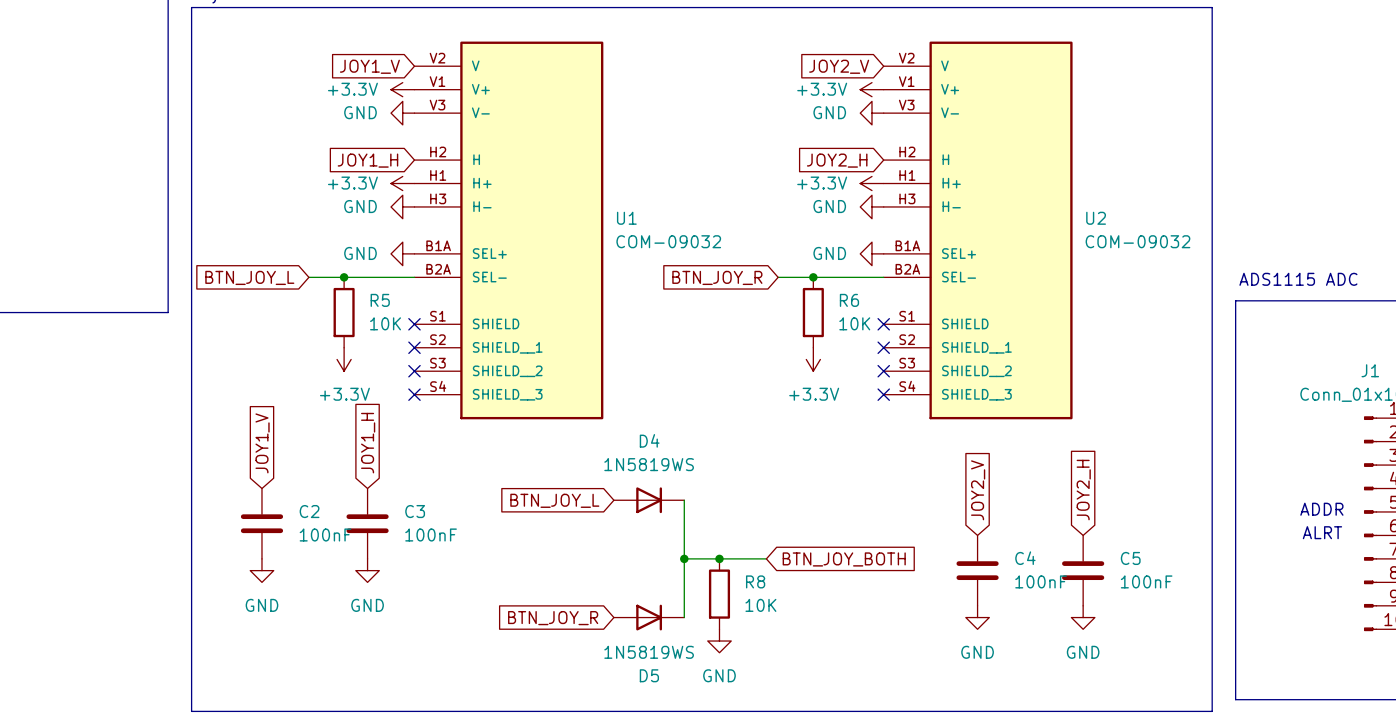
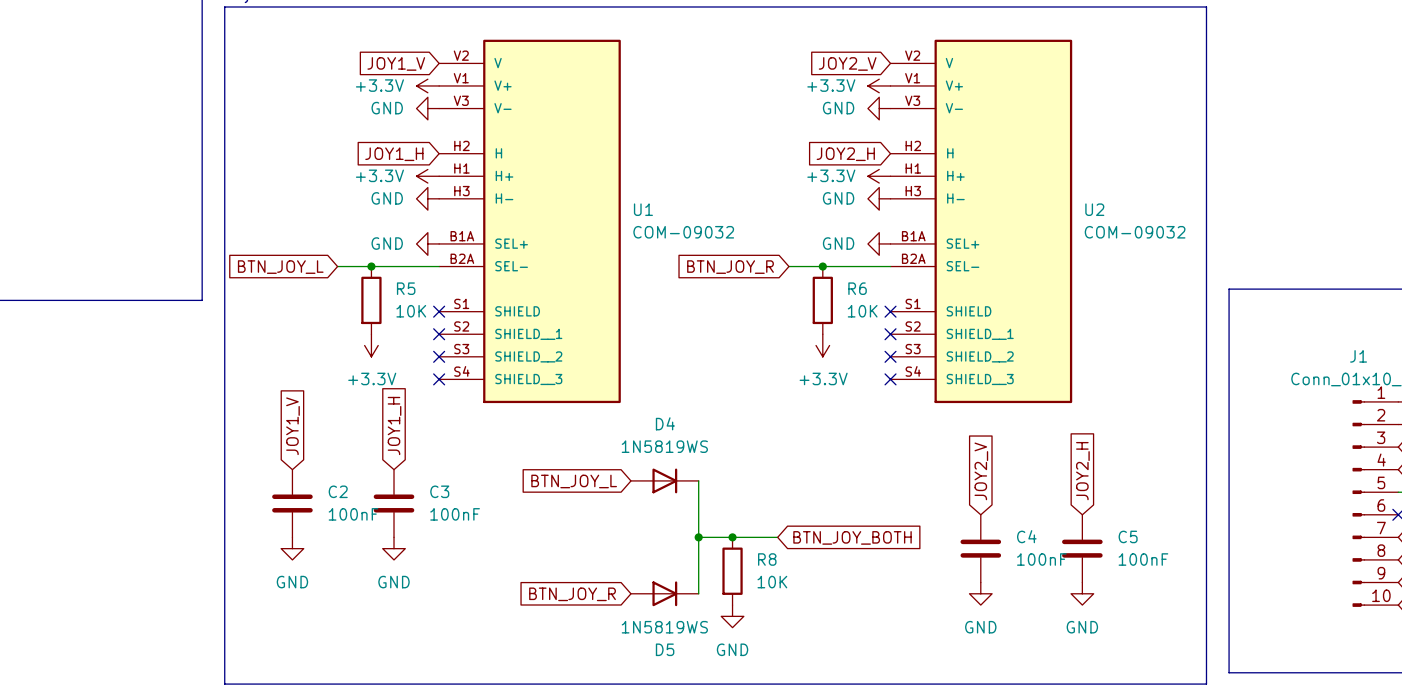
text: ADS1115 ADC (1298, 279) -> none
text: ADDR (1321, 509) -> none
text: ALRT (1322, 532) -> none

